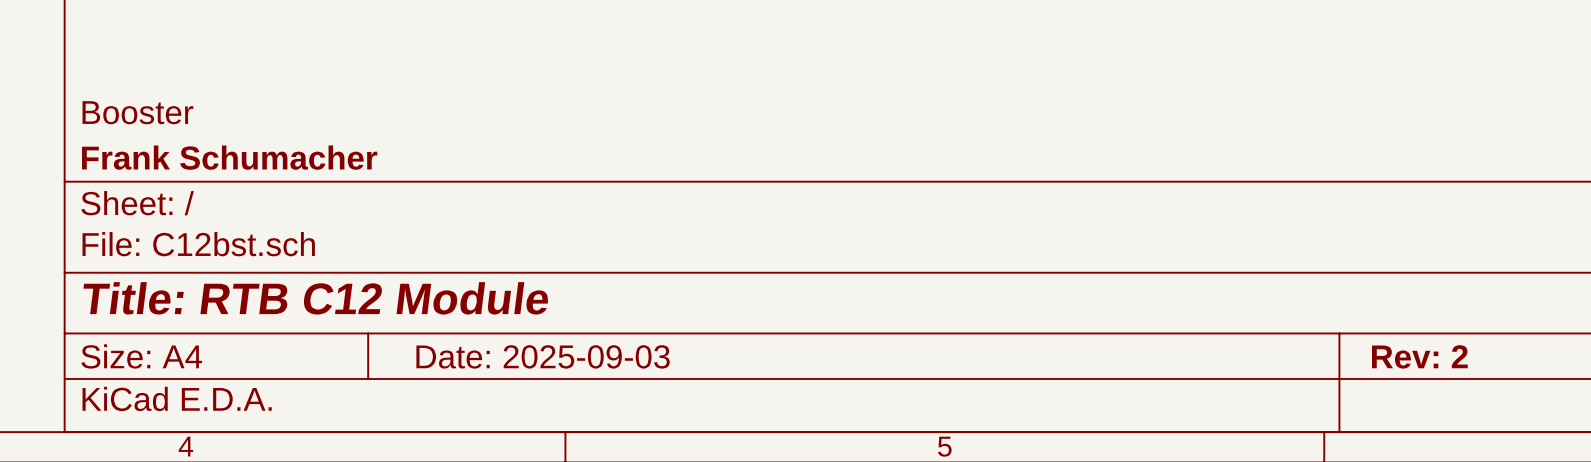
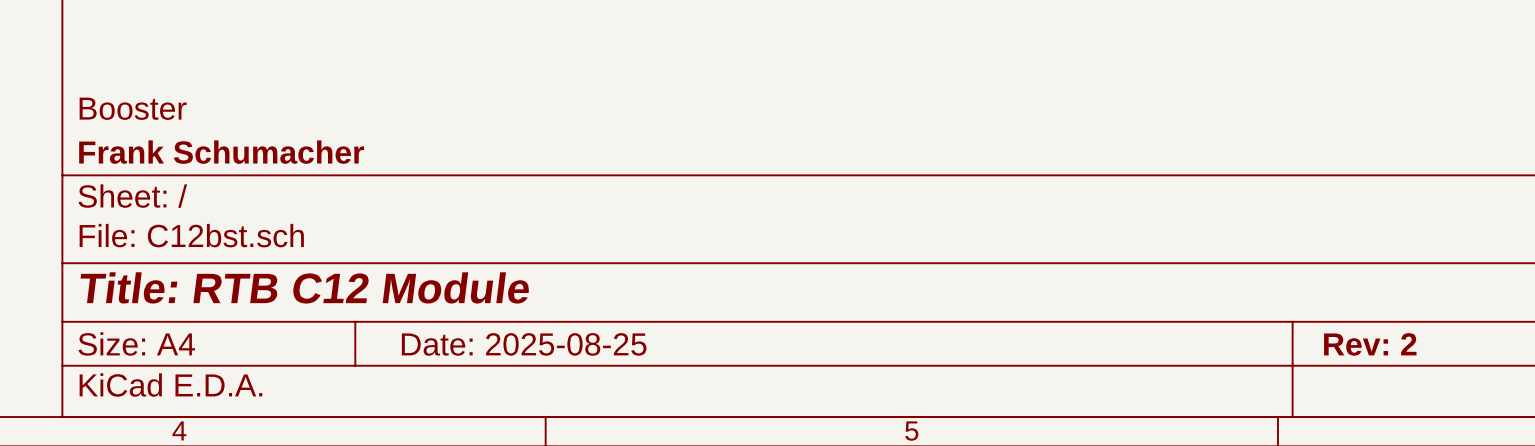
title block: Date: 2025-09-03 (543, 356) -> Date: 2025-08-25 (524, 344)

